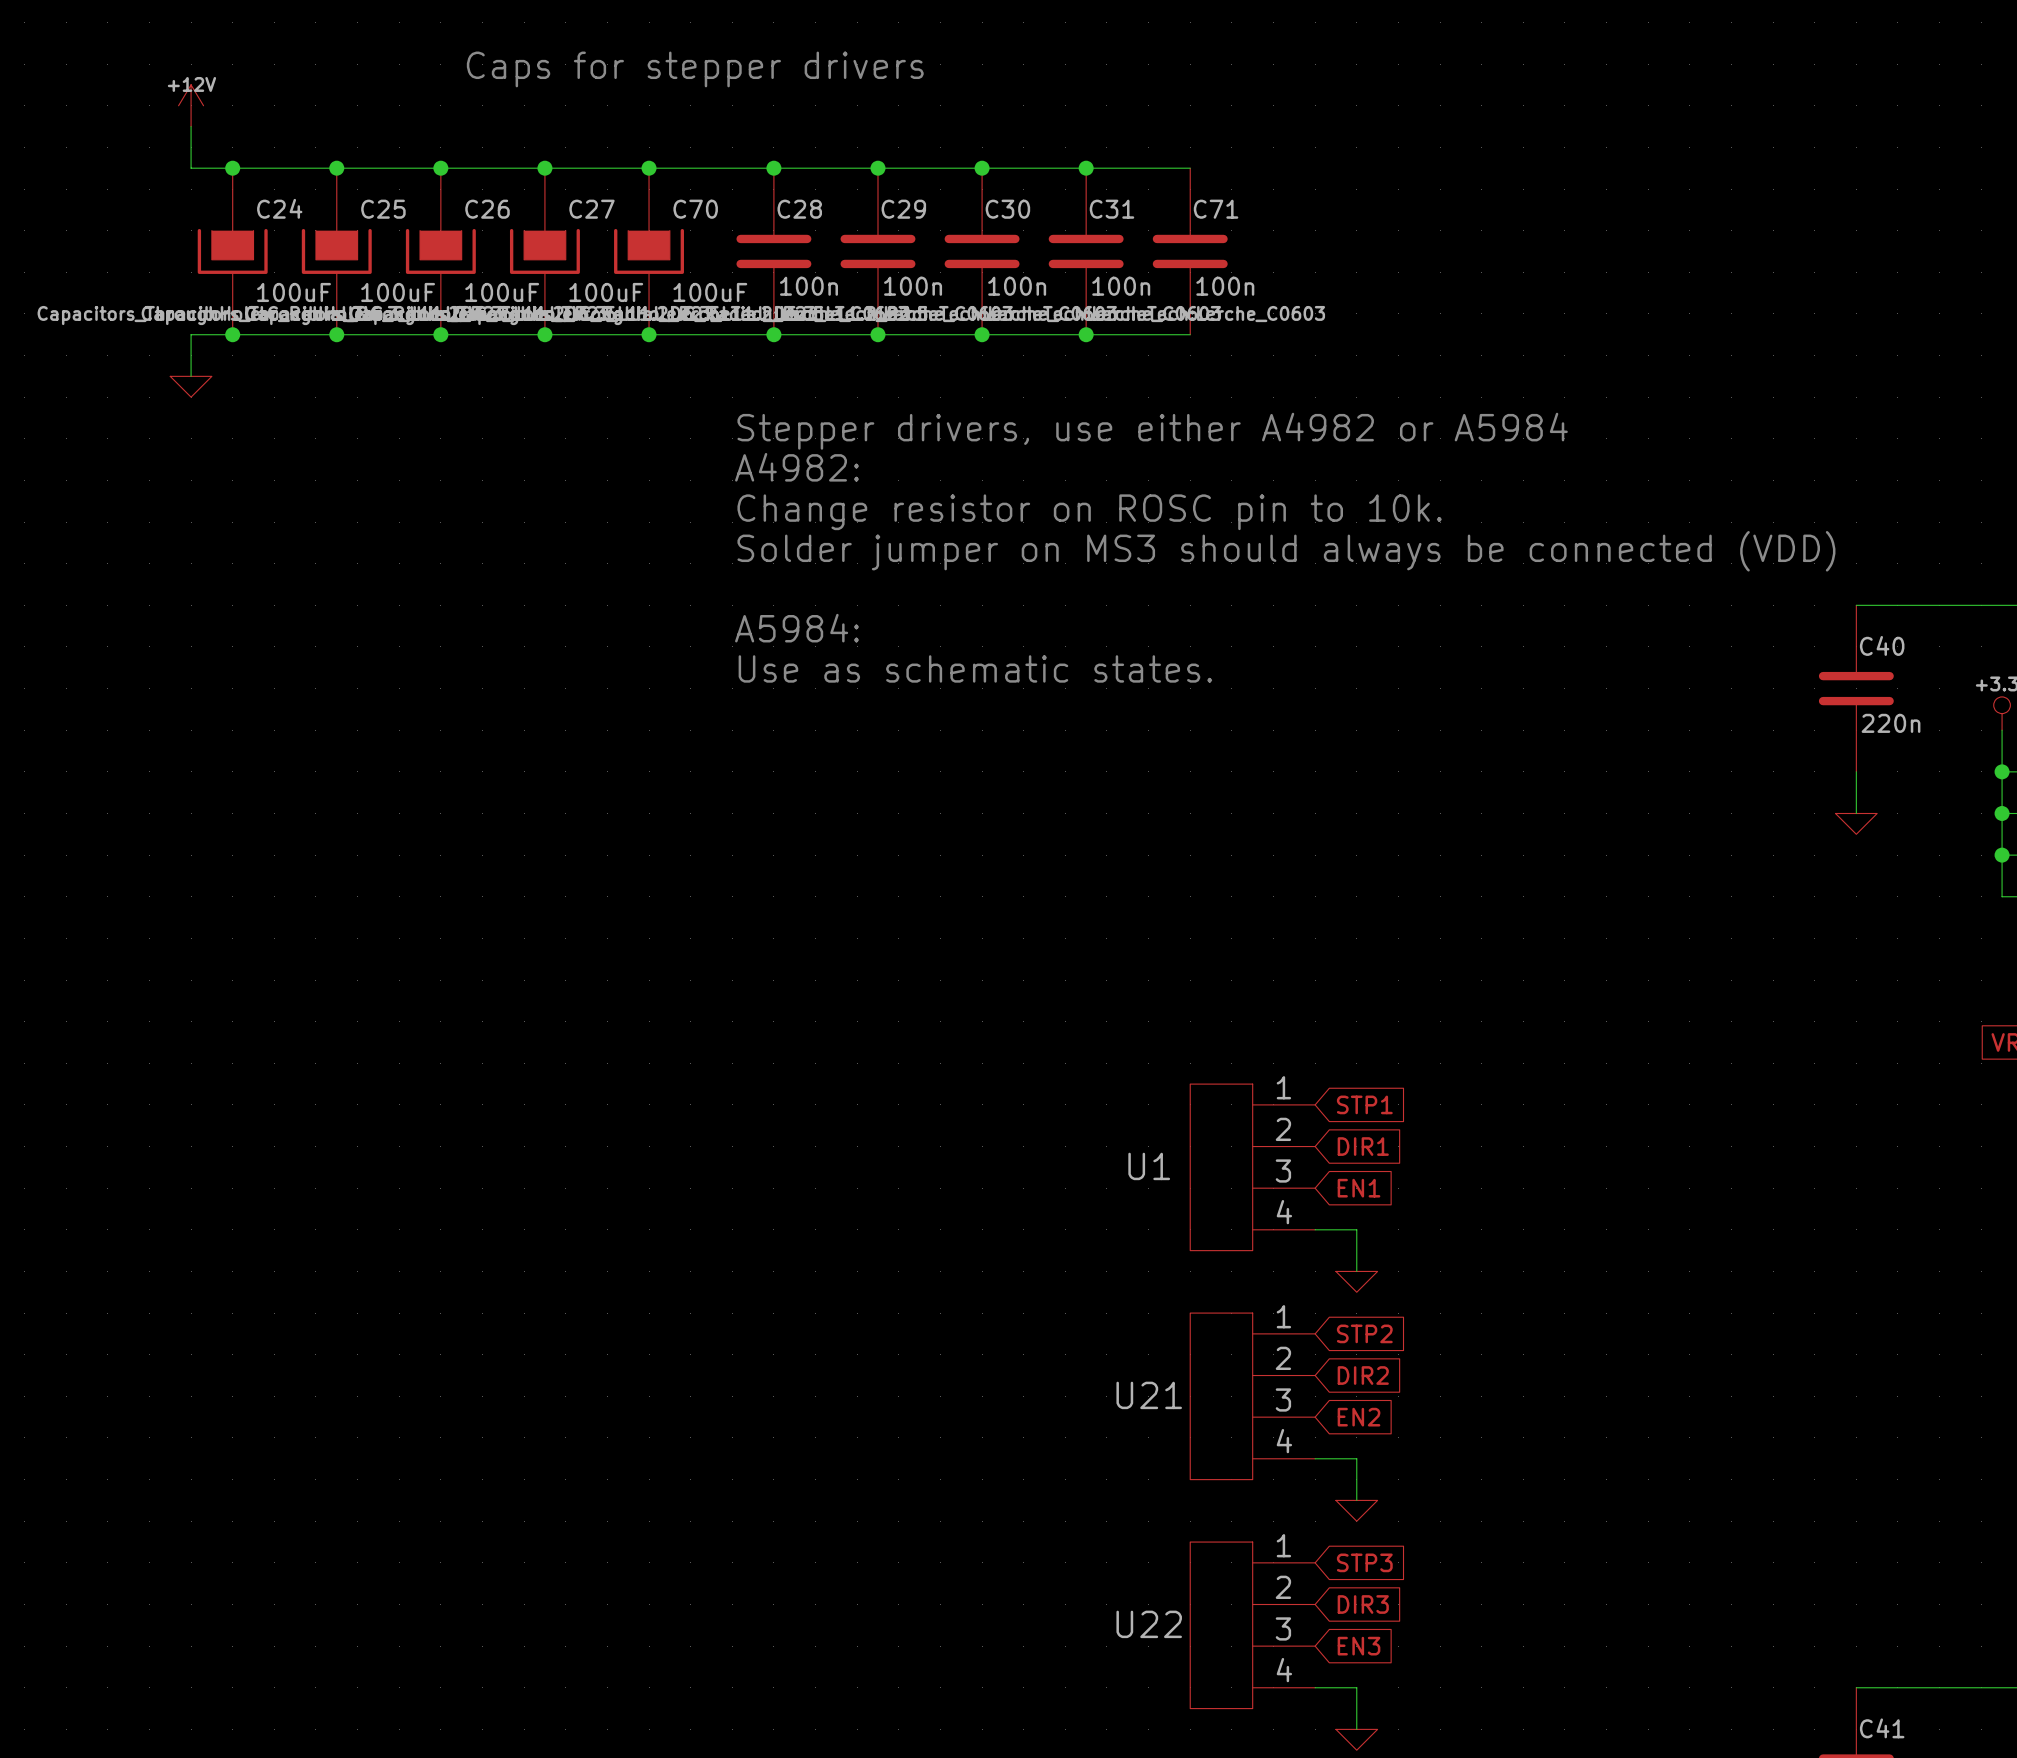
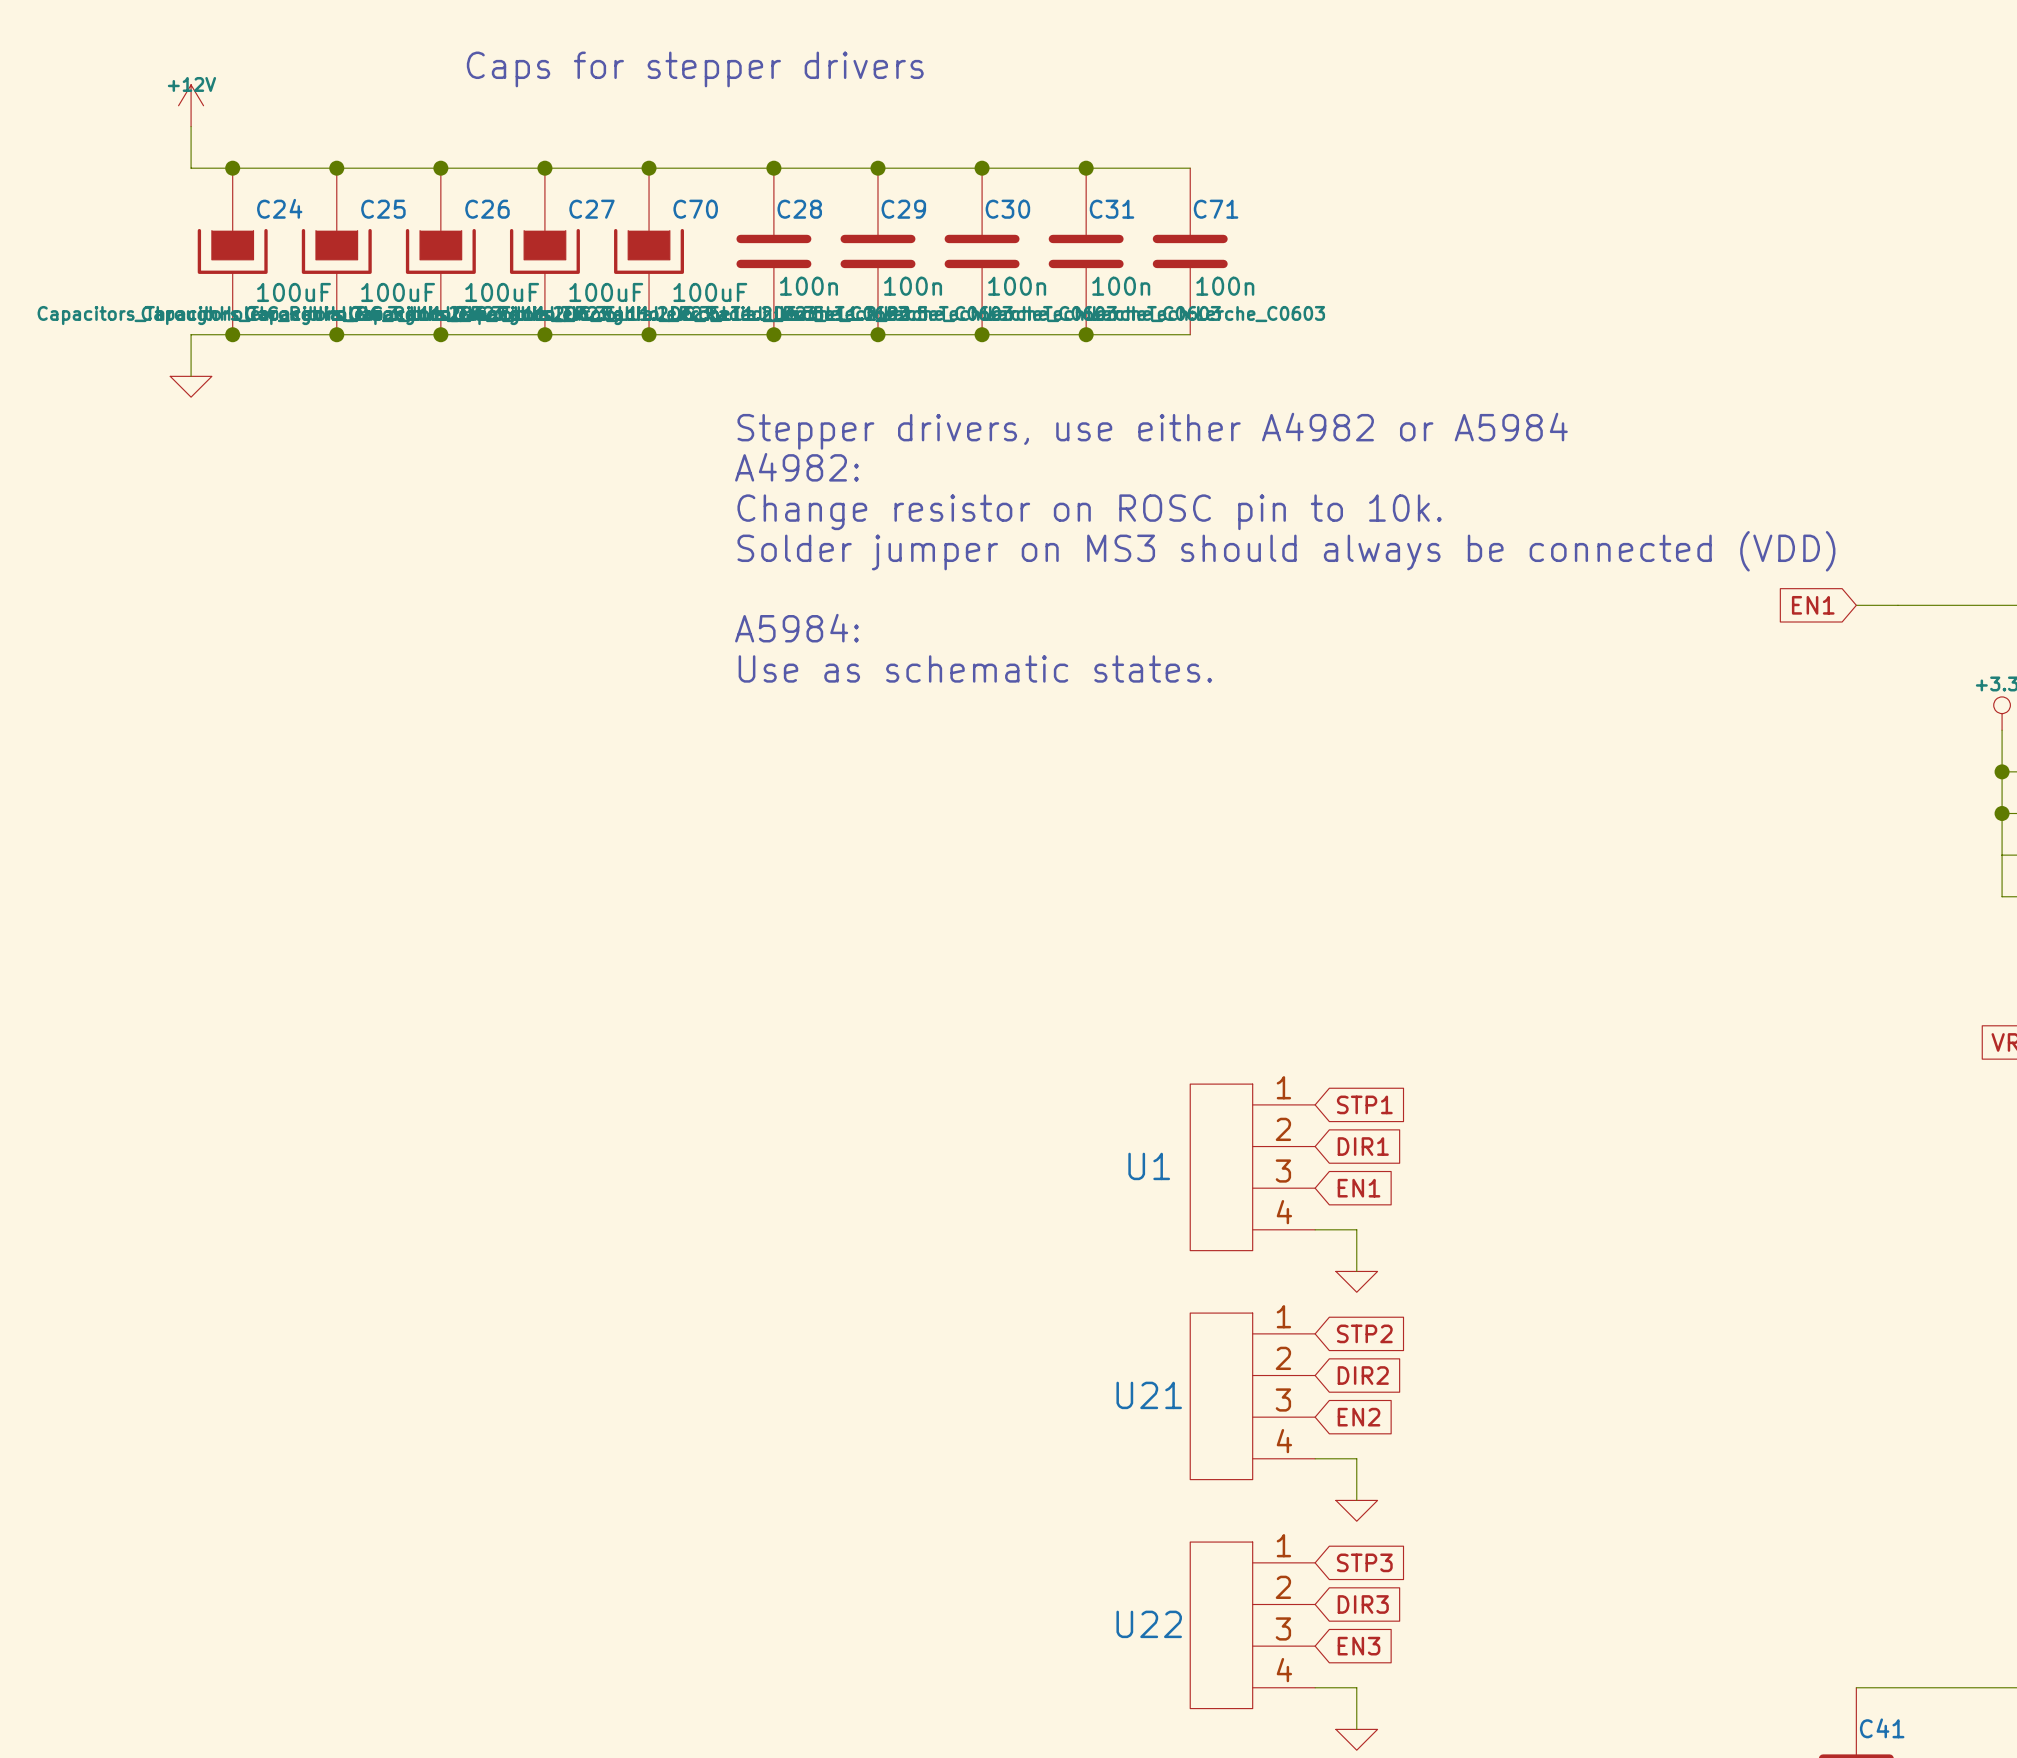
global label: none -> EN1 (1813, 605)
C40: 220n (1856, 688) -> none
wire: (1856, 771) (1856, 813) -> none
power symbol: (1856, 823) -> none
junction: (2002, 855) -> none

